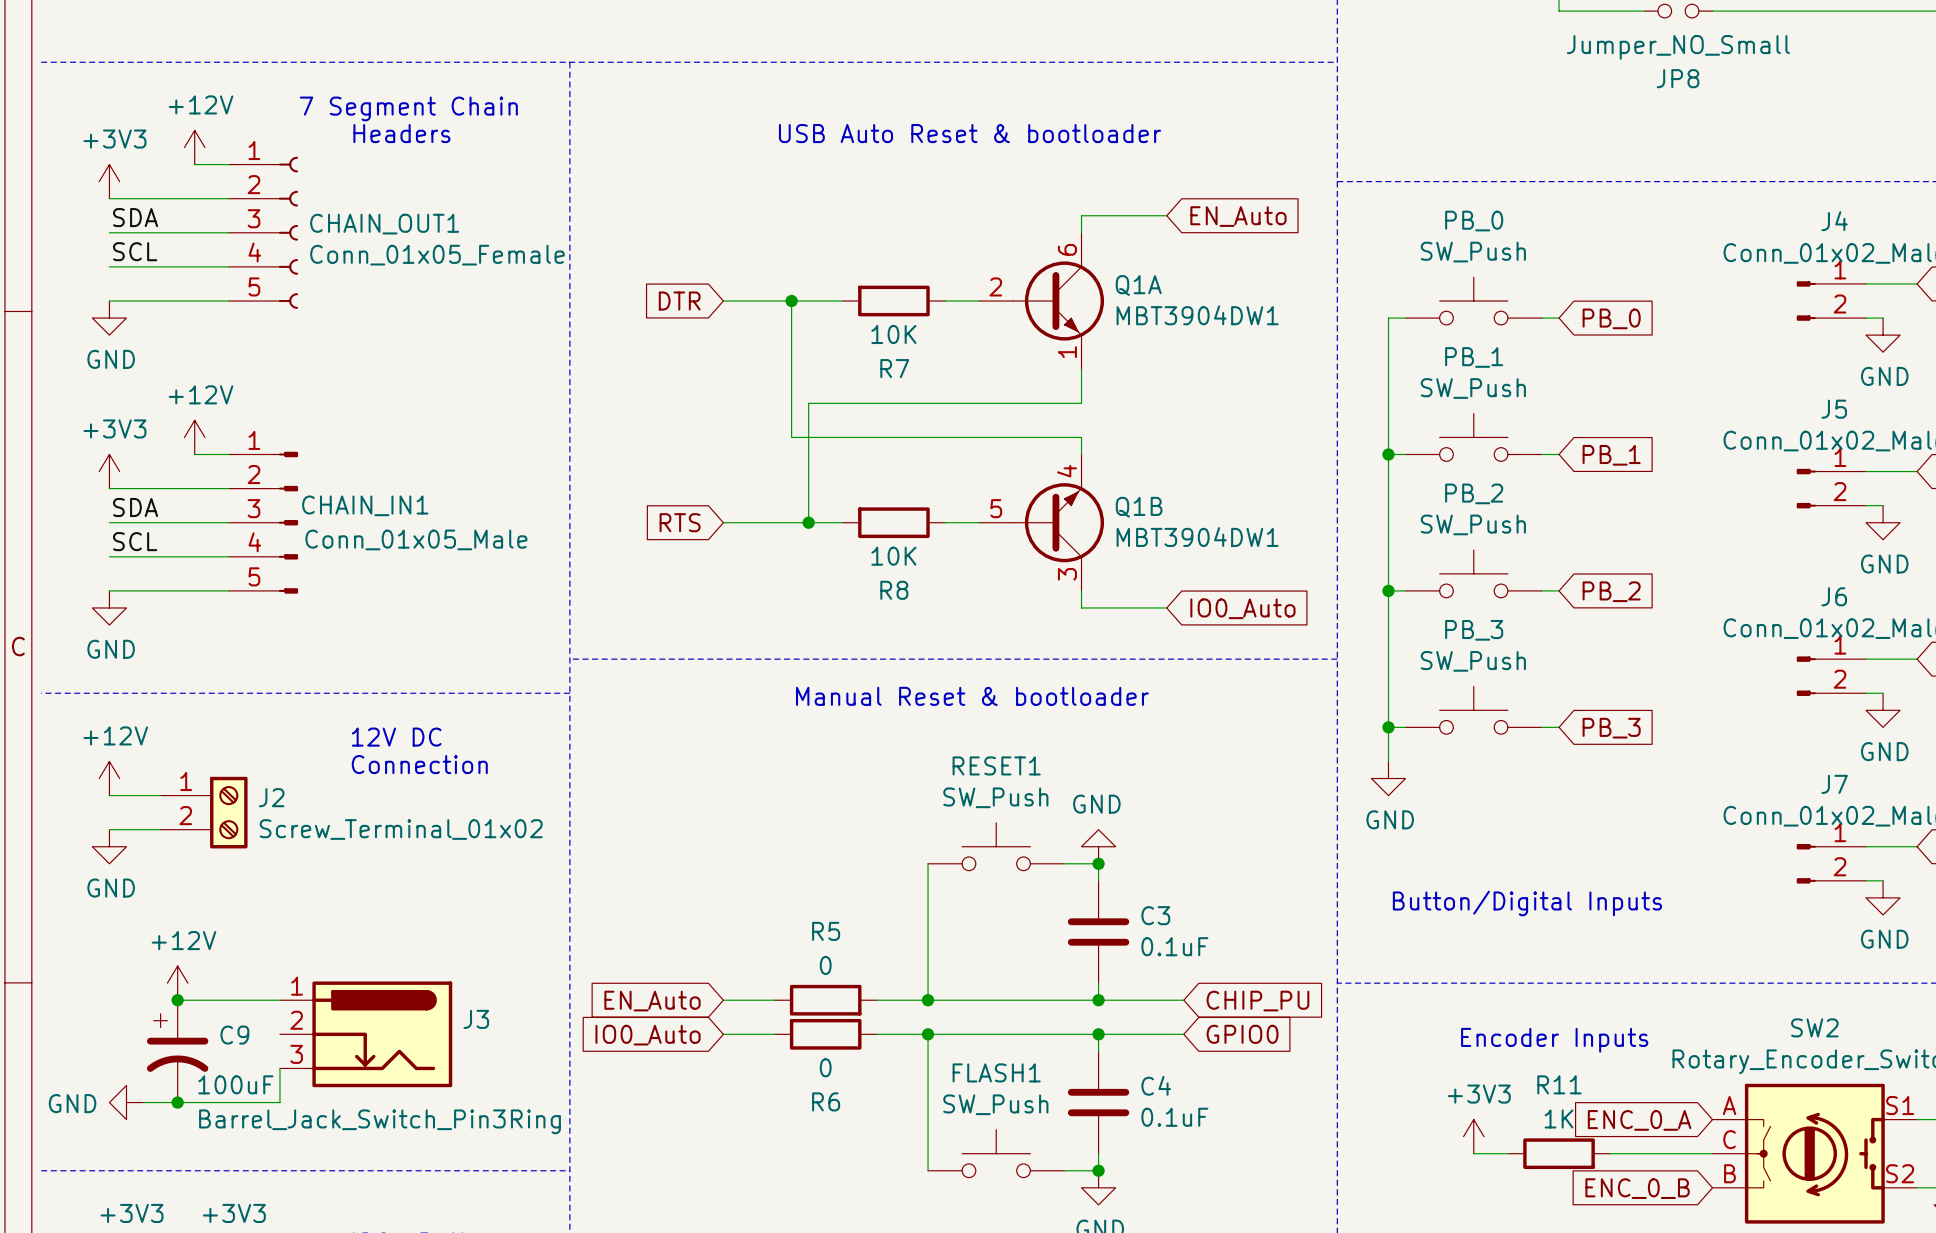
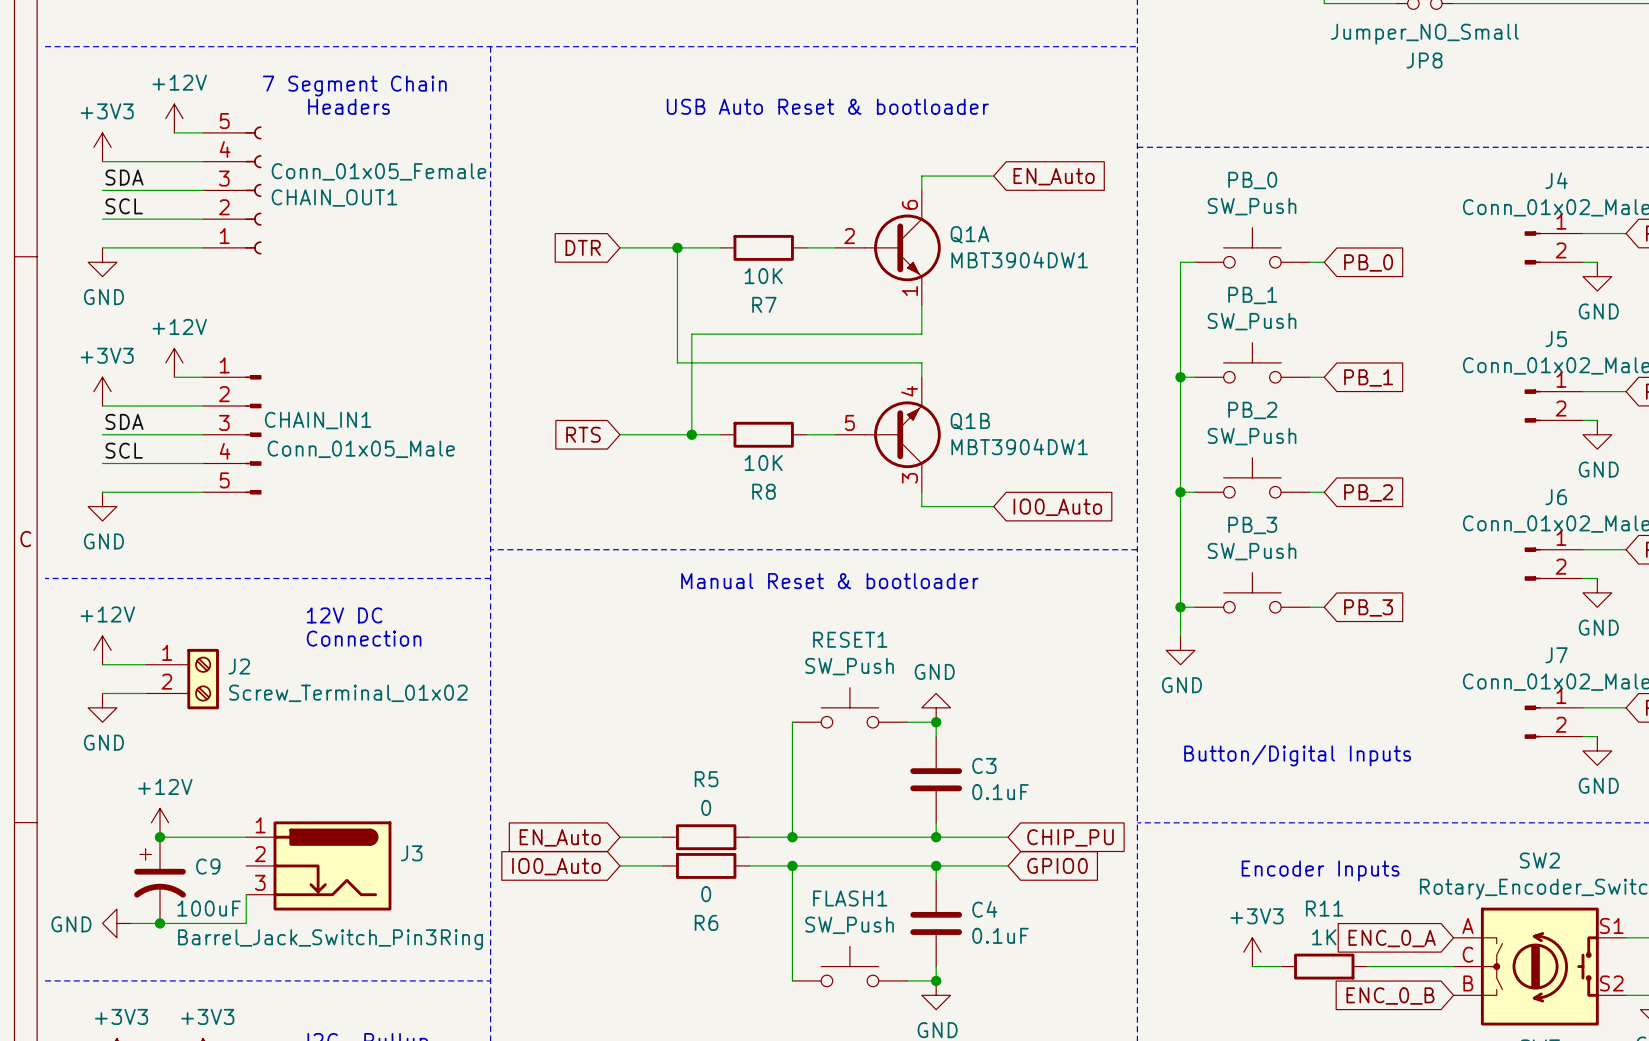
CHAIN_OUT1 flip: as is (288, 232) -> up-down (253, 190)

